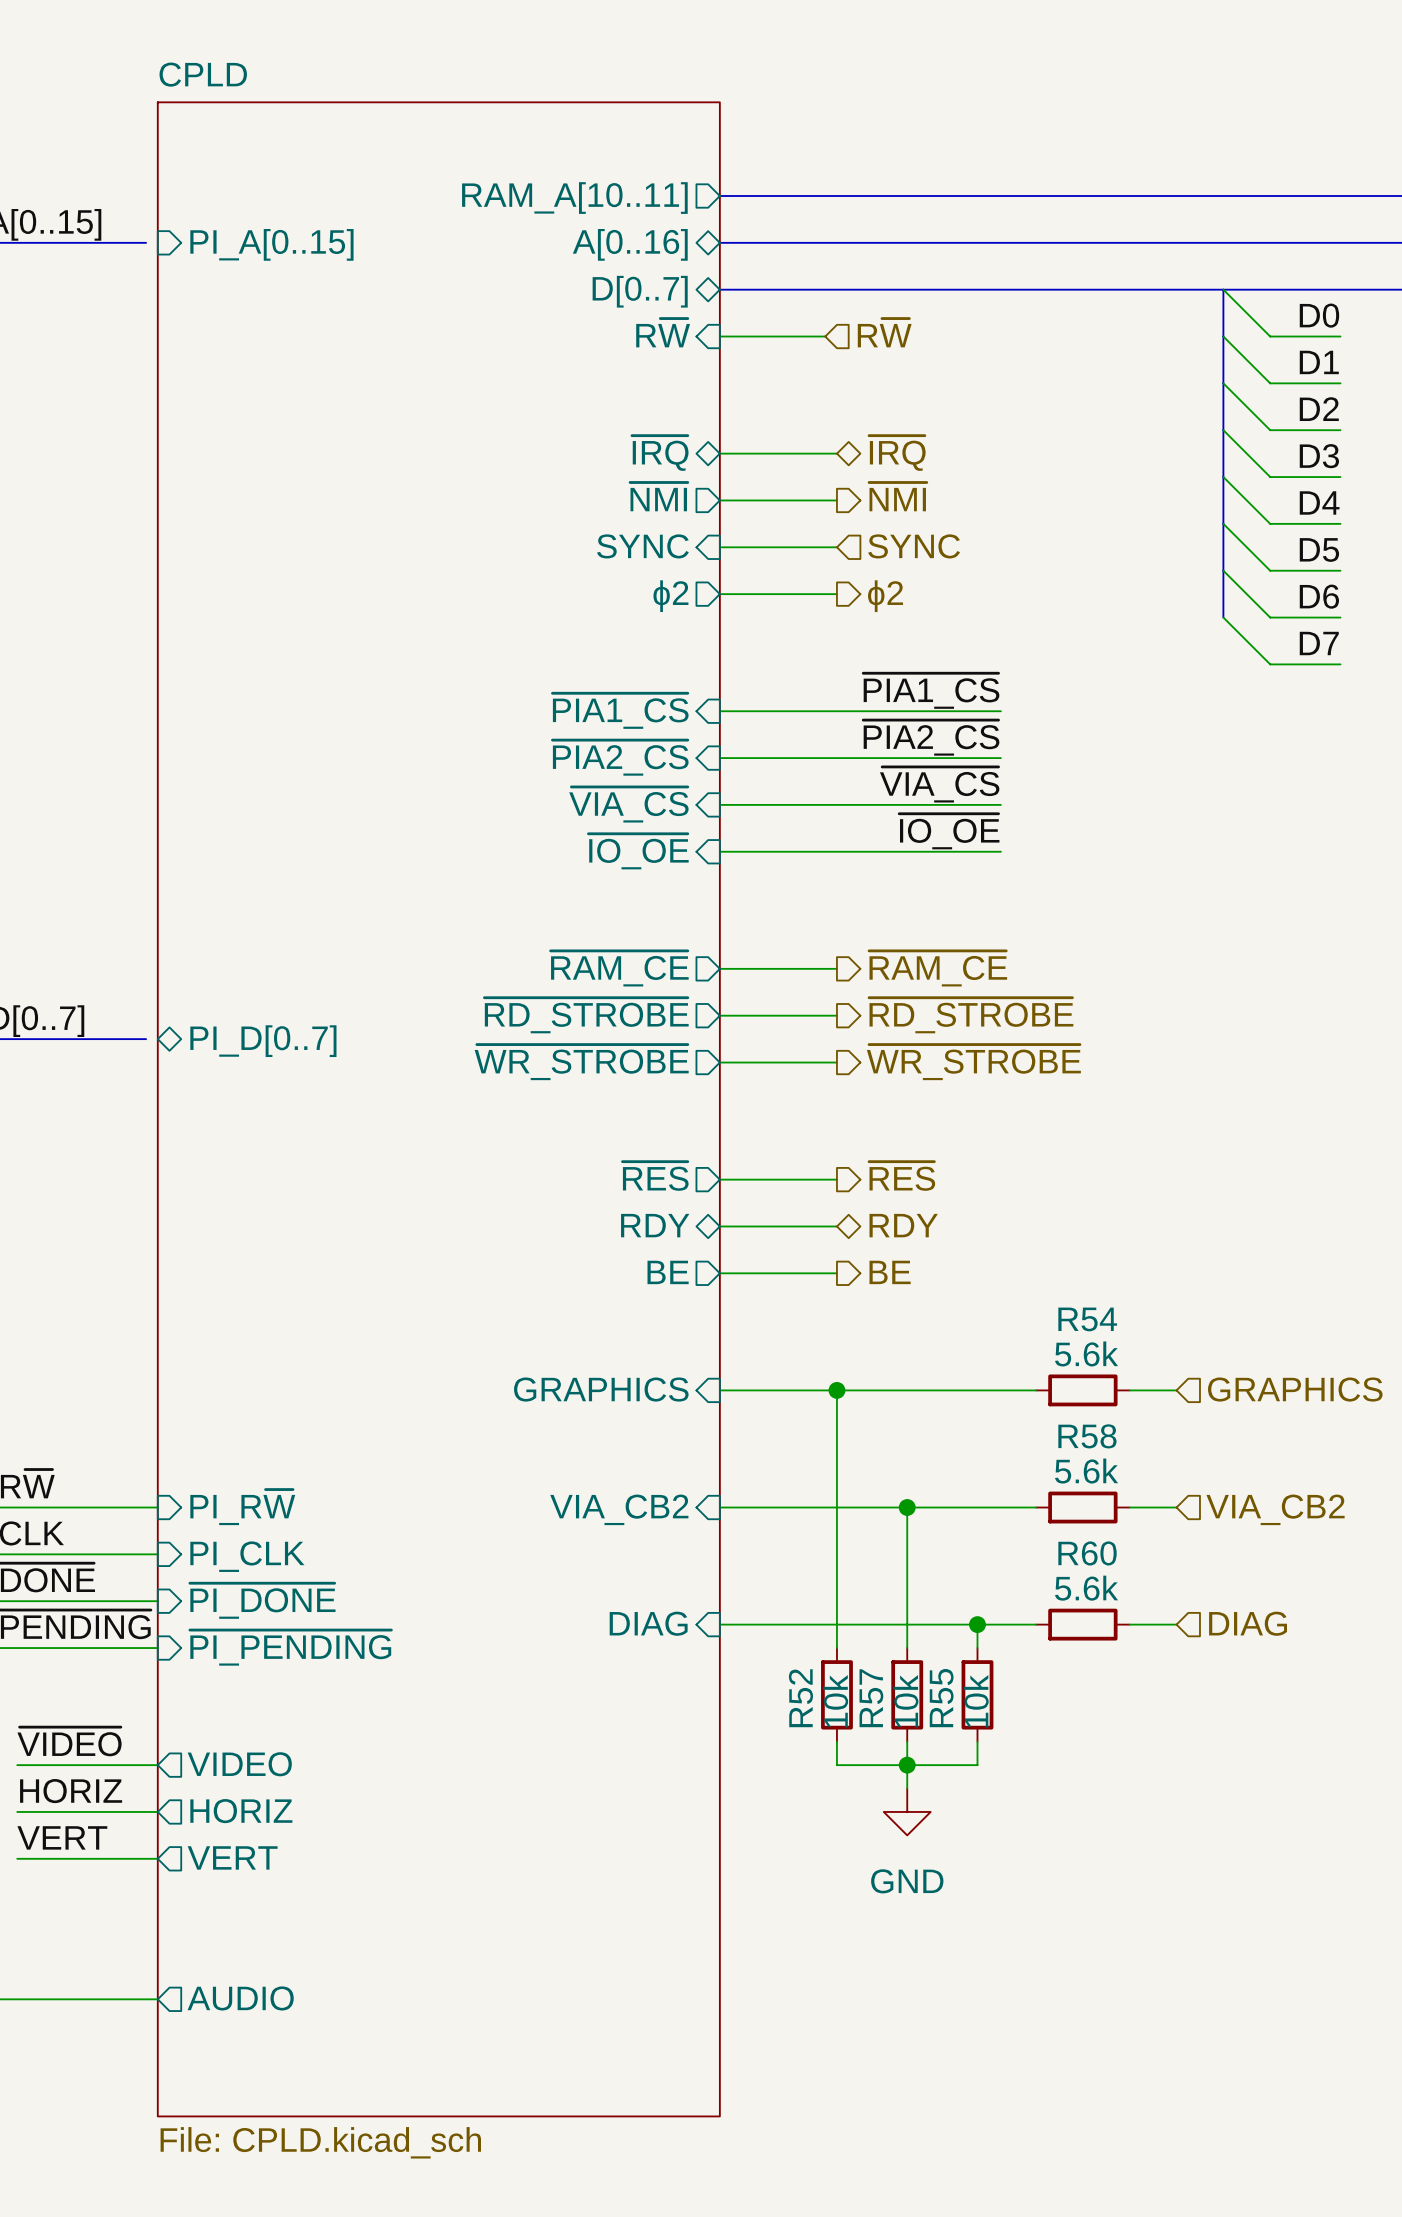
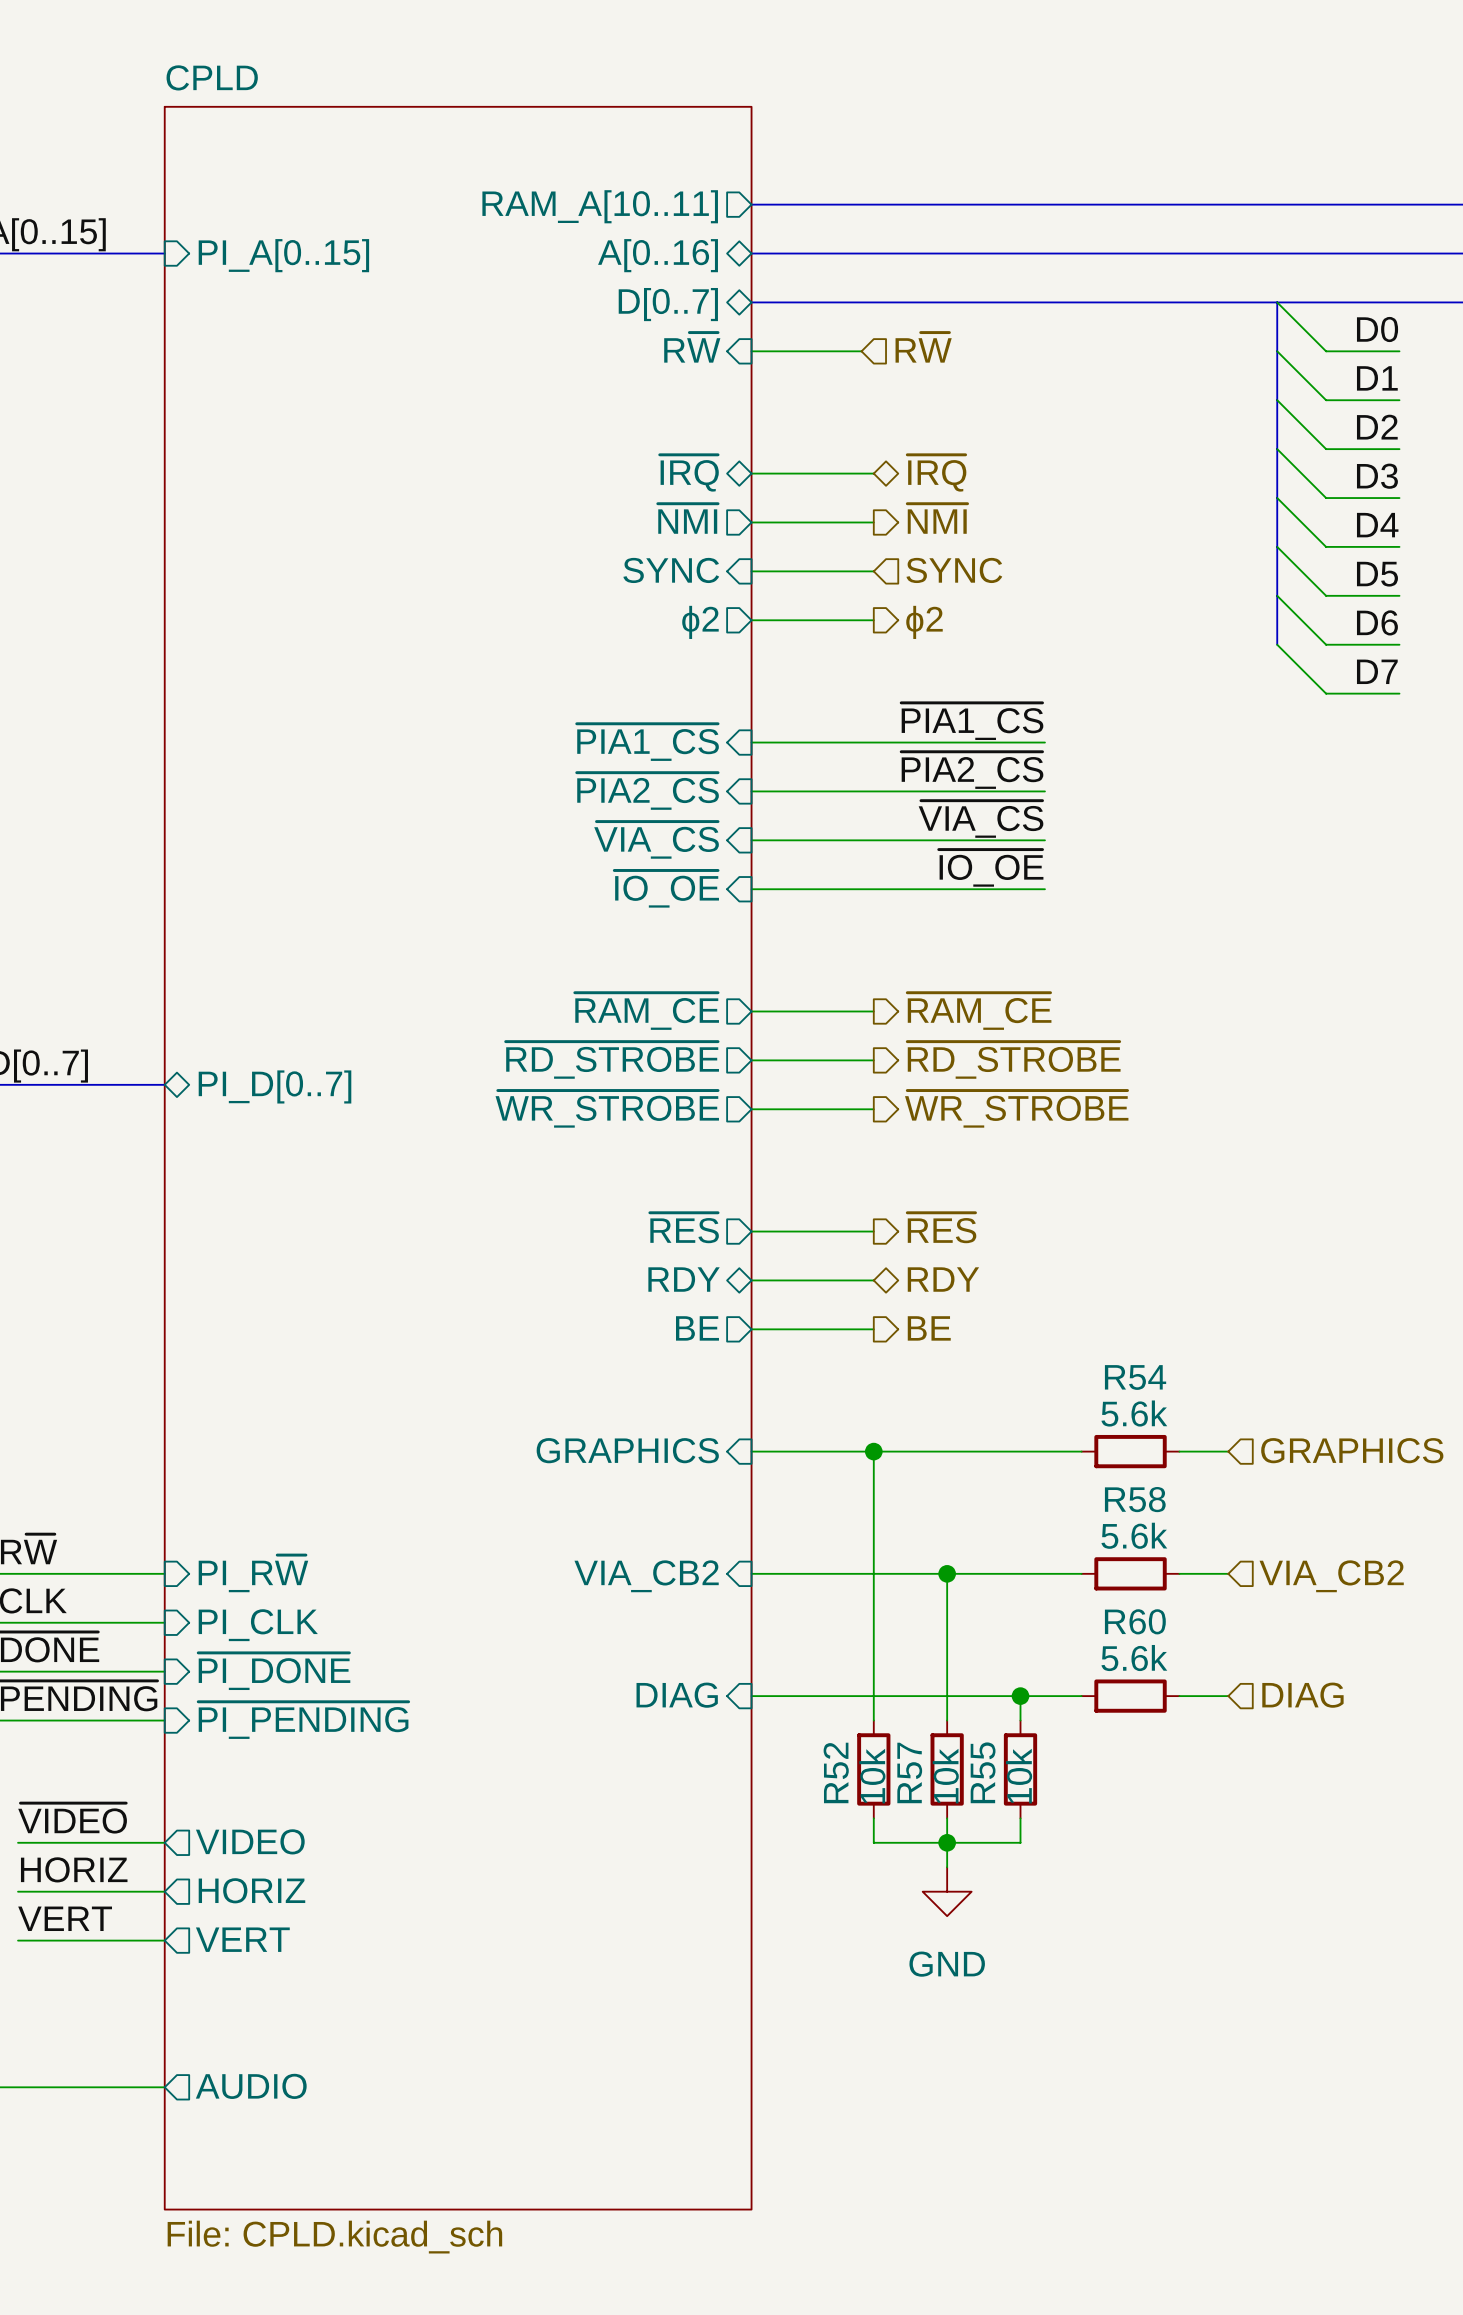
bus: none -> (152, 253) (164, 253)
bus: none -> (152, 1084) (164, 1084)

